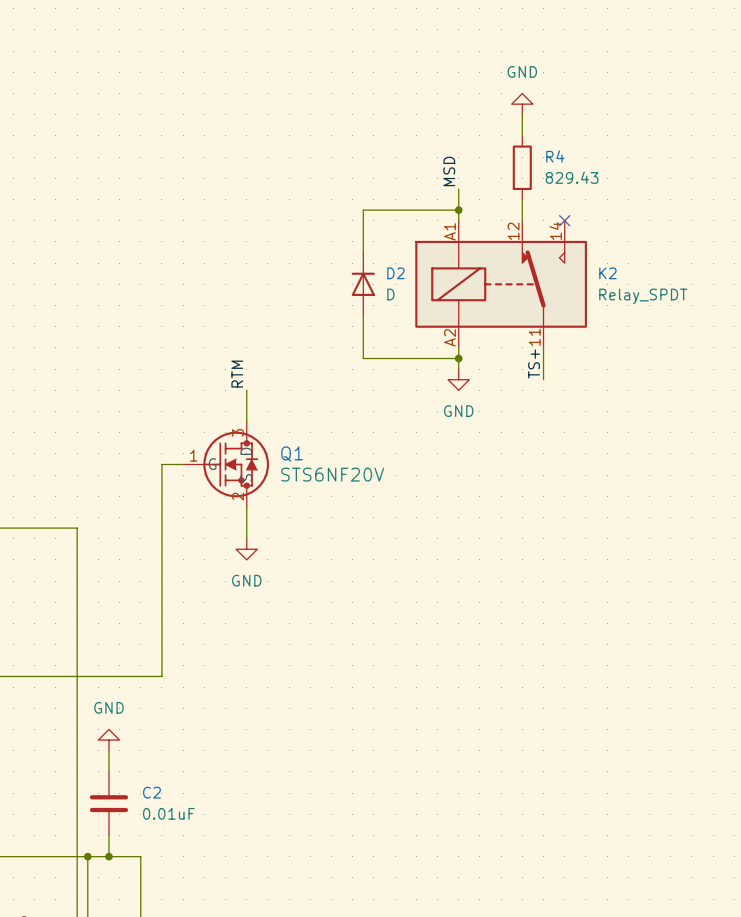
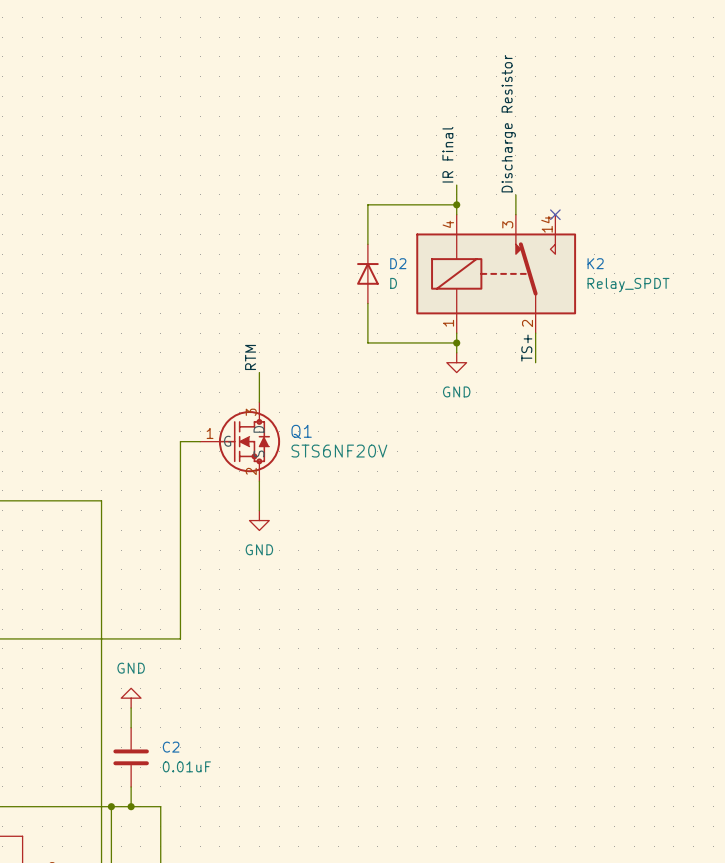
power symbol: GND (522, 104) -> none
wire: (522, 114) (522, 135) -> none
label: none -> Discharge Resistor (508, 123)
R4: 829.43 (522, 167) -> none
label: MSD (449, 171) -> IR Final (447, 154)
K2 pin number: A1 (449, 231) -> 4 (448, 224)
K2 pin number: 12 (513, 231) -> 3 (507, 224)
K2 pin number: A2 (449, 337) -> 1 (448, 323)
K2 pin number: 11 (534, 337) -> 2 (527, 323)

